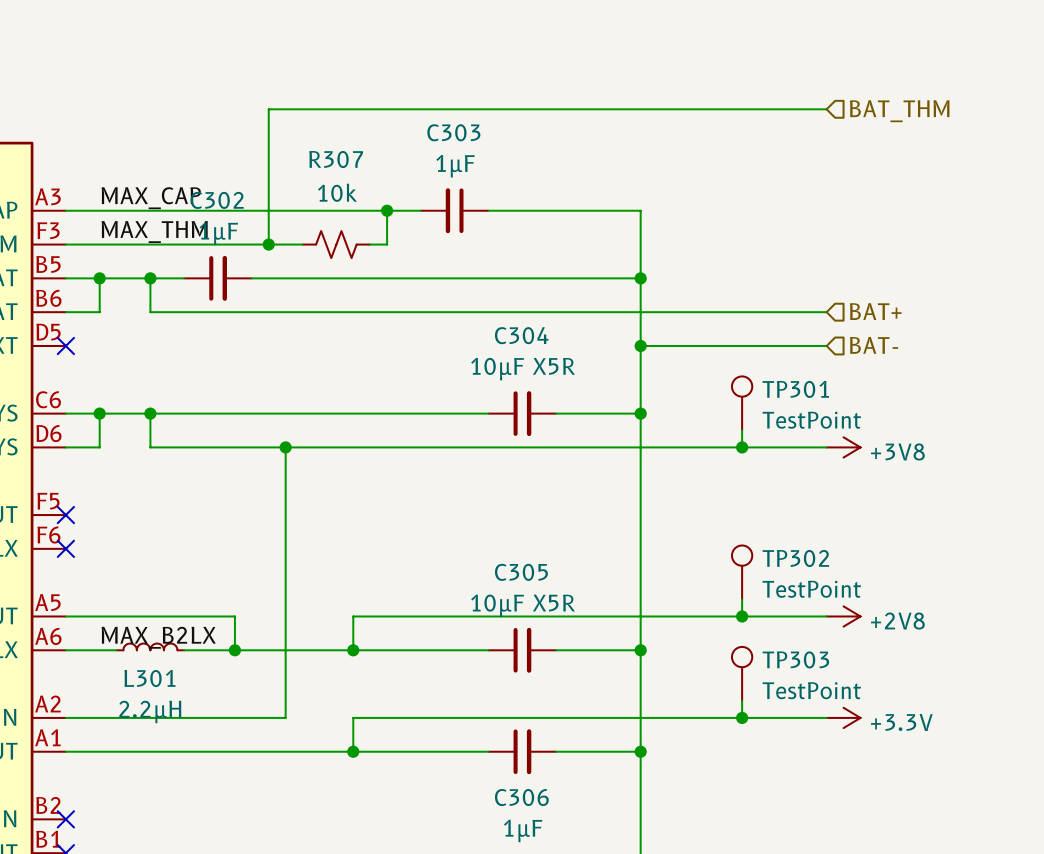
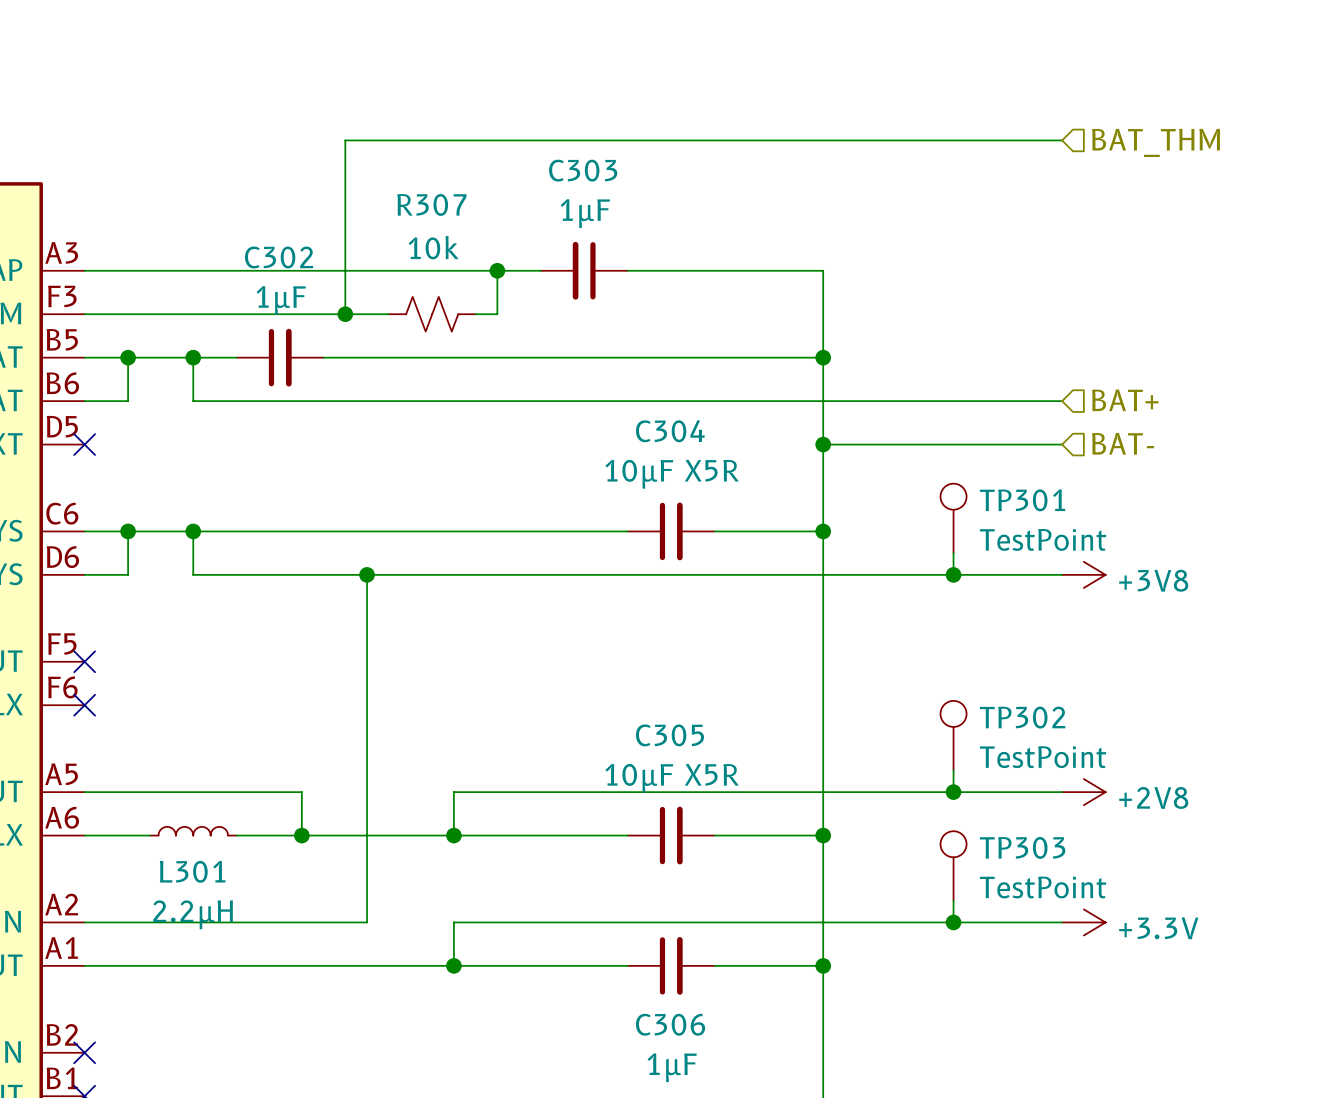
label: MAX_CAP (151, 198) -> none
label: MAX_THM (154, 231) -> none
label: MAX_B2LX (158, 637) -> none

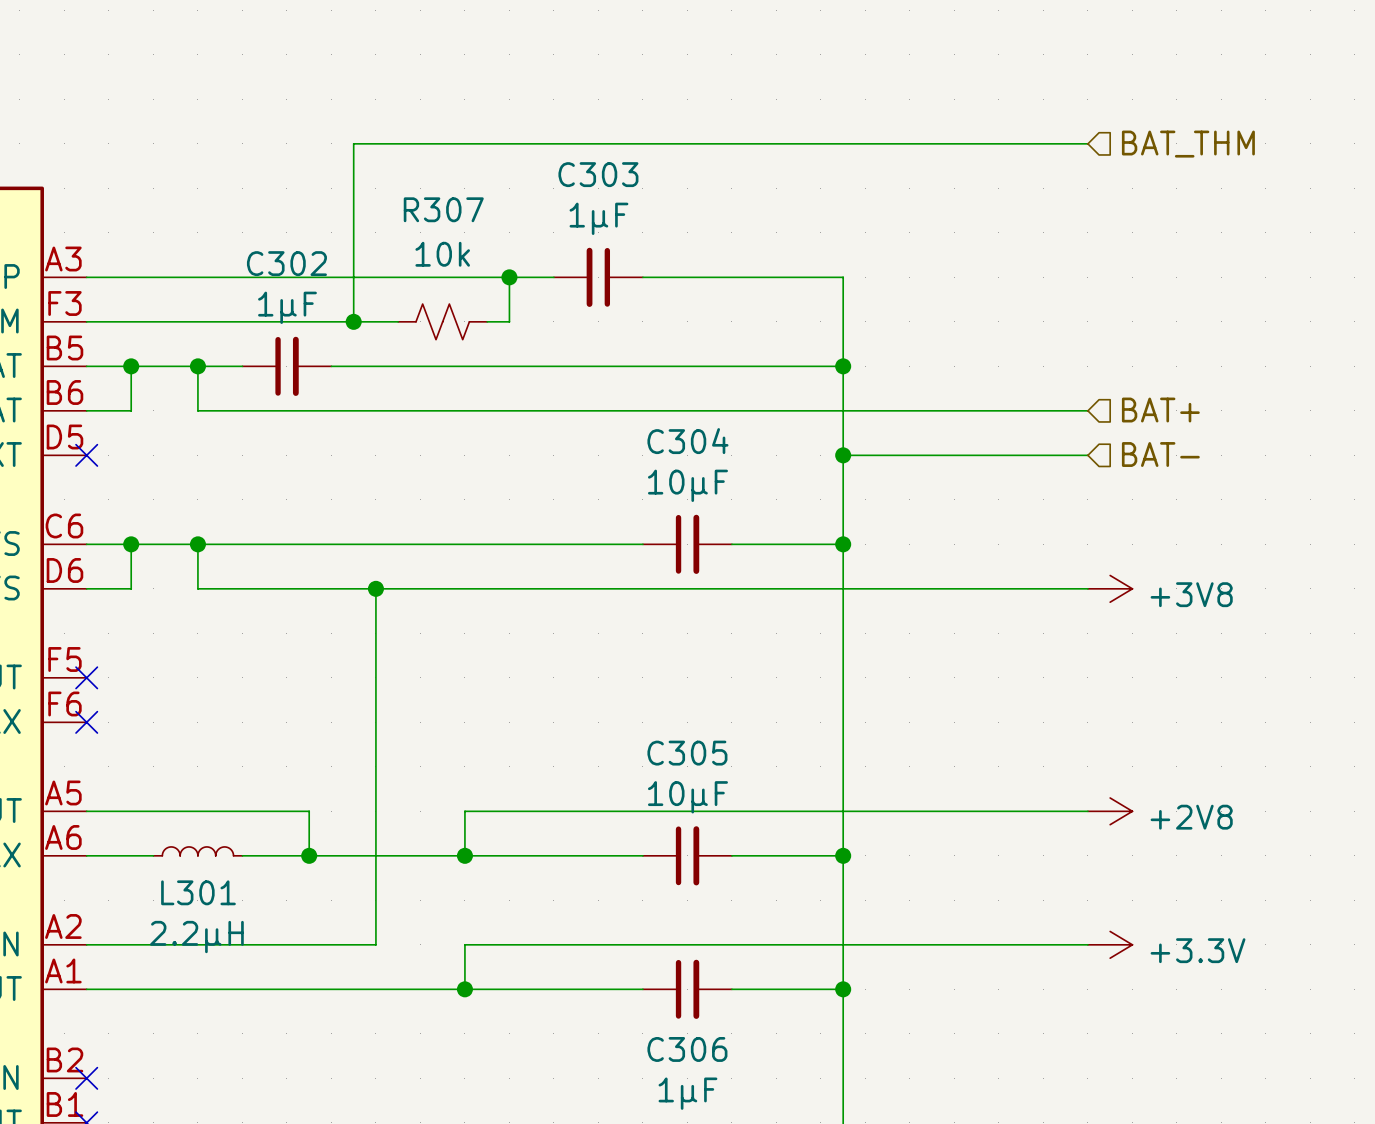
C304 value: 10µF X5R (672, 474) -> 10µF (687, 485)
TP301: TestPoint (953, 518) -> none
wire: (953, 553) (953, 574) -> none
junction: (953, 574) -> none
TP302: TestPoint (953, 735) -> none
wire: (953, 770) (953, 792) -> none
C305 value: 10µF X5R (672, 778) -> 10µF (687, 797)
junction: (953, 792) -> none
TP303: TestPoint (953, 865) -> none
wire: (953, 900) (953, 922) -> none
junction: (953, 922) -> none

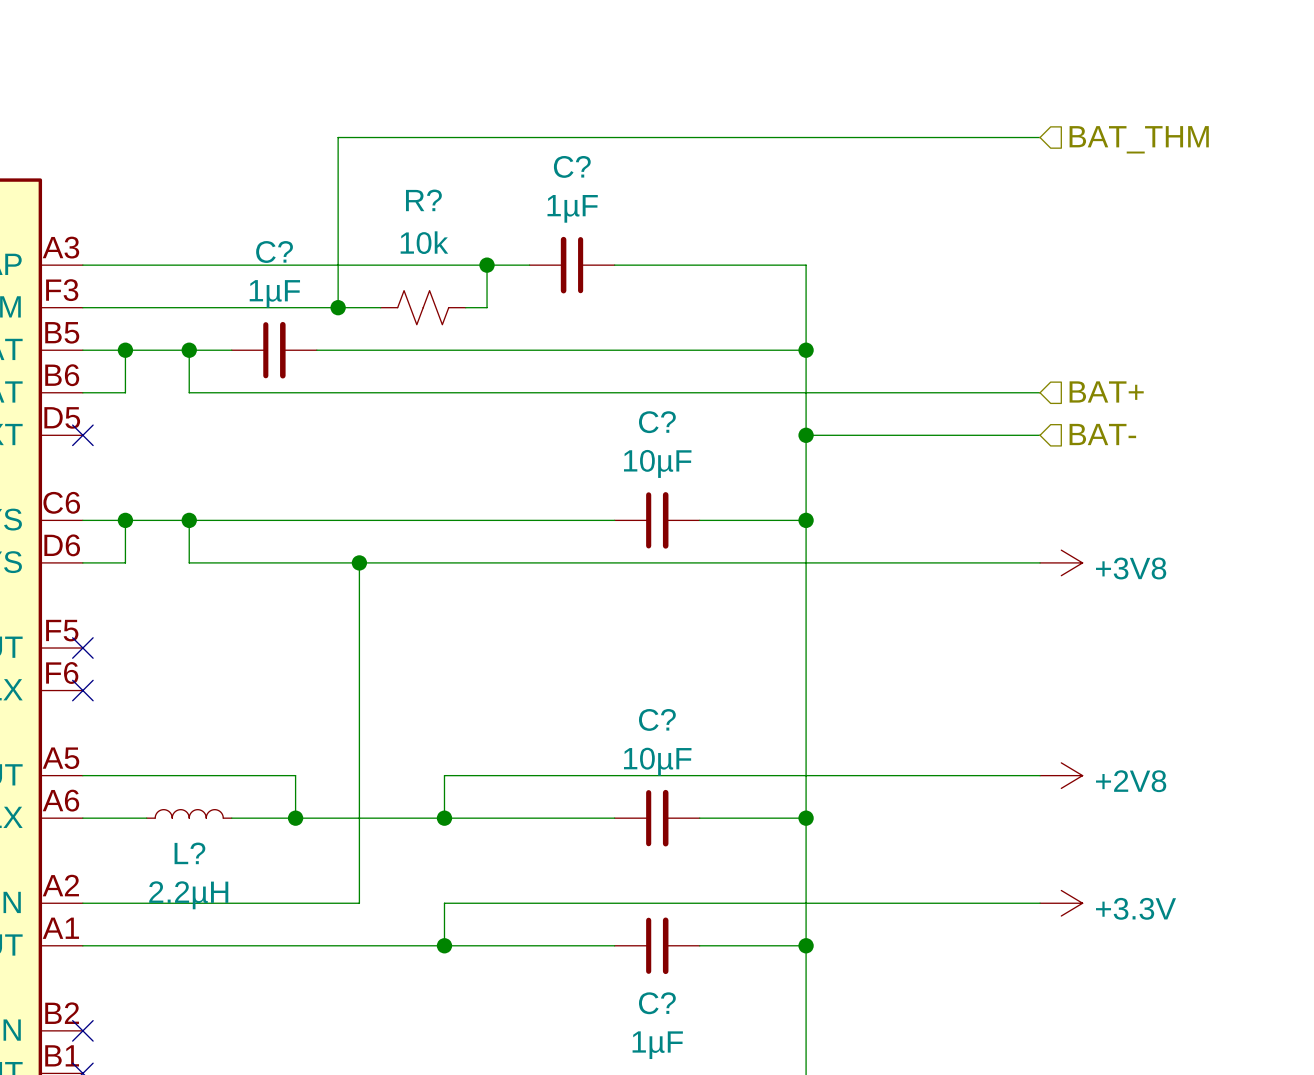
C303 name: C303 (598, 174) -> C? (572, 166)
R307 name: R307 (443, 209) -> R? (423, 200)
C302 name: C302 (286, 263) -> C? (274, 252)
C304 name: C304 (687, 441) -> C? (657, 422)
C305 name: C305 (687, 753) -> C? (657, 719)
L301 name: L301 (198, 892) -> L? (189, 853)
C306 name: C306 (687, 1049) -> C? (657, 1003)

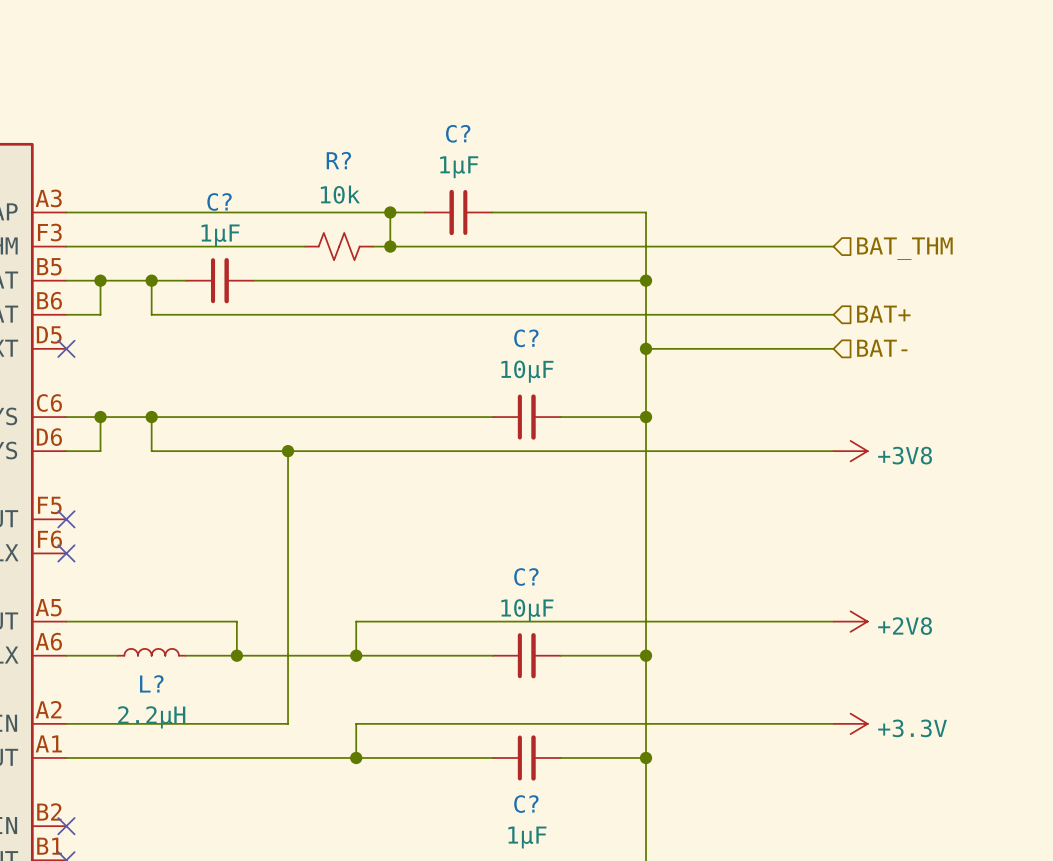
wire: (1040, 137) (338, 137) (338, 307) -> none
hierarchical label position: BAT_THM (1139, 139) -> BAT_THM (904, 248)
junction: (338, 307) -> none
wire: none -> (390, 246) (833, 246)
junction: none -> (390, 246)

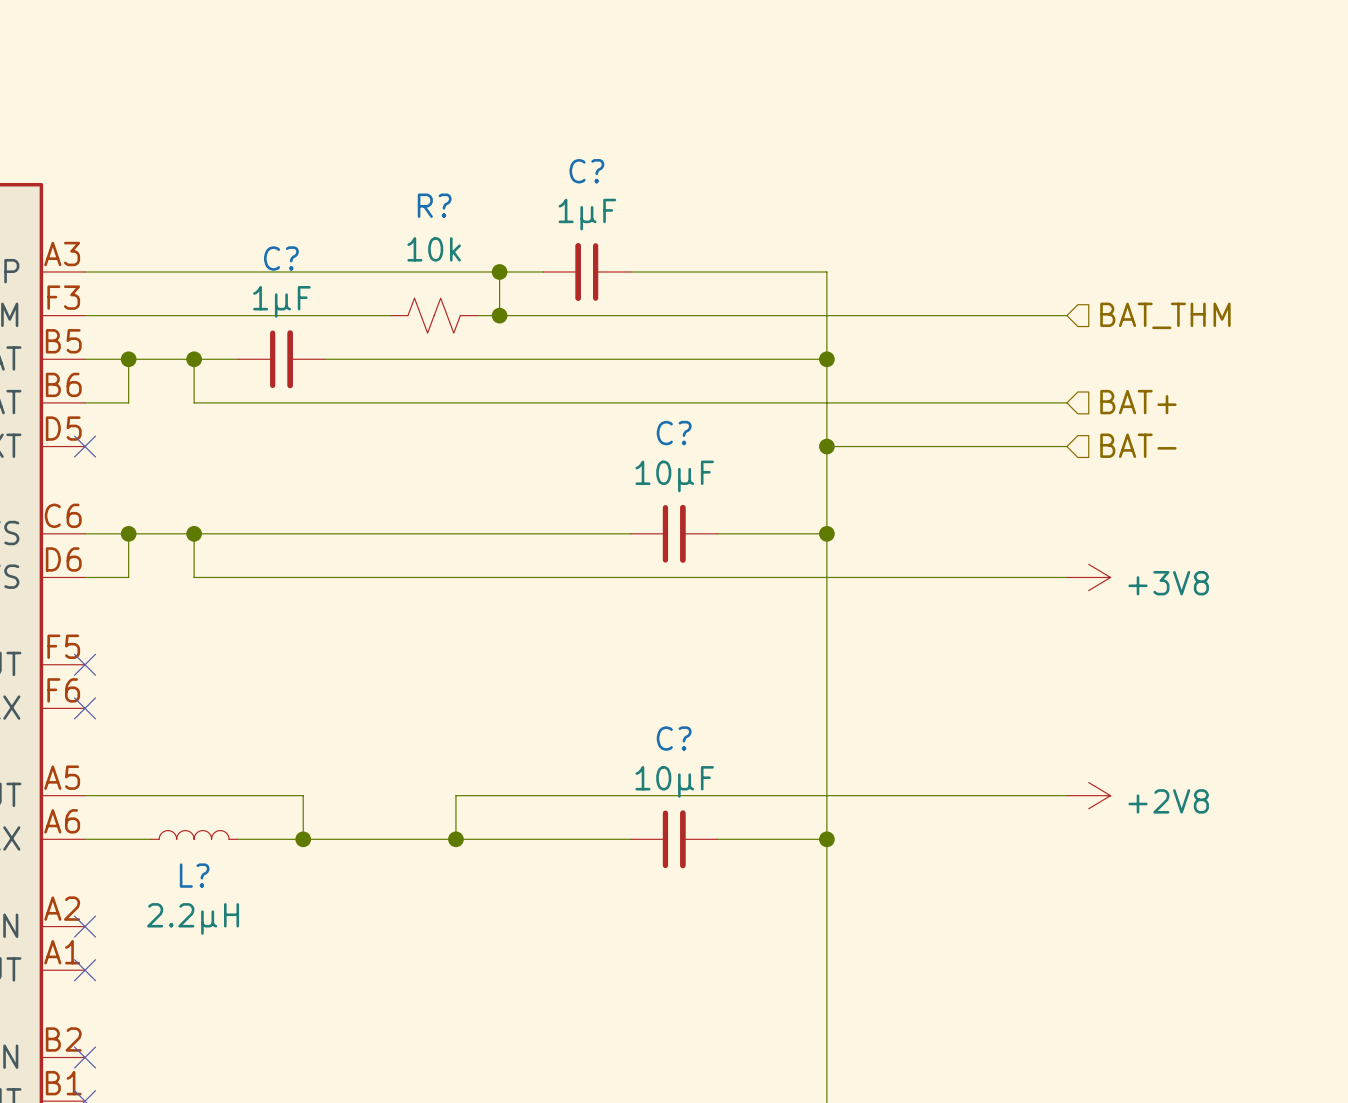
wire: (288, 451) (288, 723) (66, 723) -> none
junction: (288, 451) -> none
no-connect mark: none -> (85, 926)
wire: (833, 723) (356, 723) (356, 757) -> none
power symbol: +3.3V (850, 723) -> none
wire: (66, 757) (492, 757) -> none
no-connect mark: none -> (85, 970)
junction: (356, 757) -> none
C?: 1µF (526, 757) -> none
wire: (560, 757) (646, 757) -> none
junction: (646, 757) -> none

